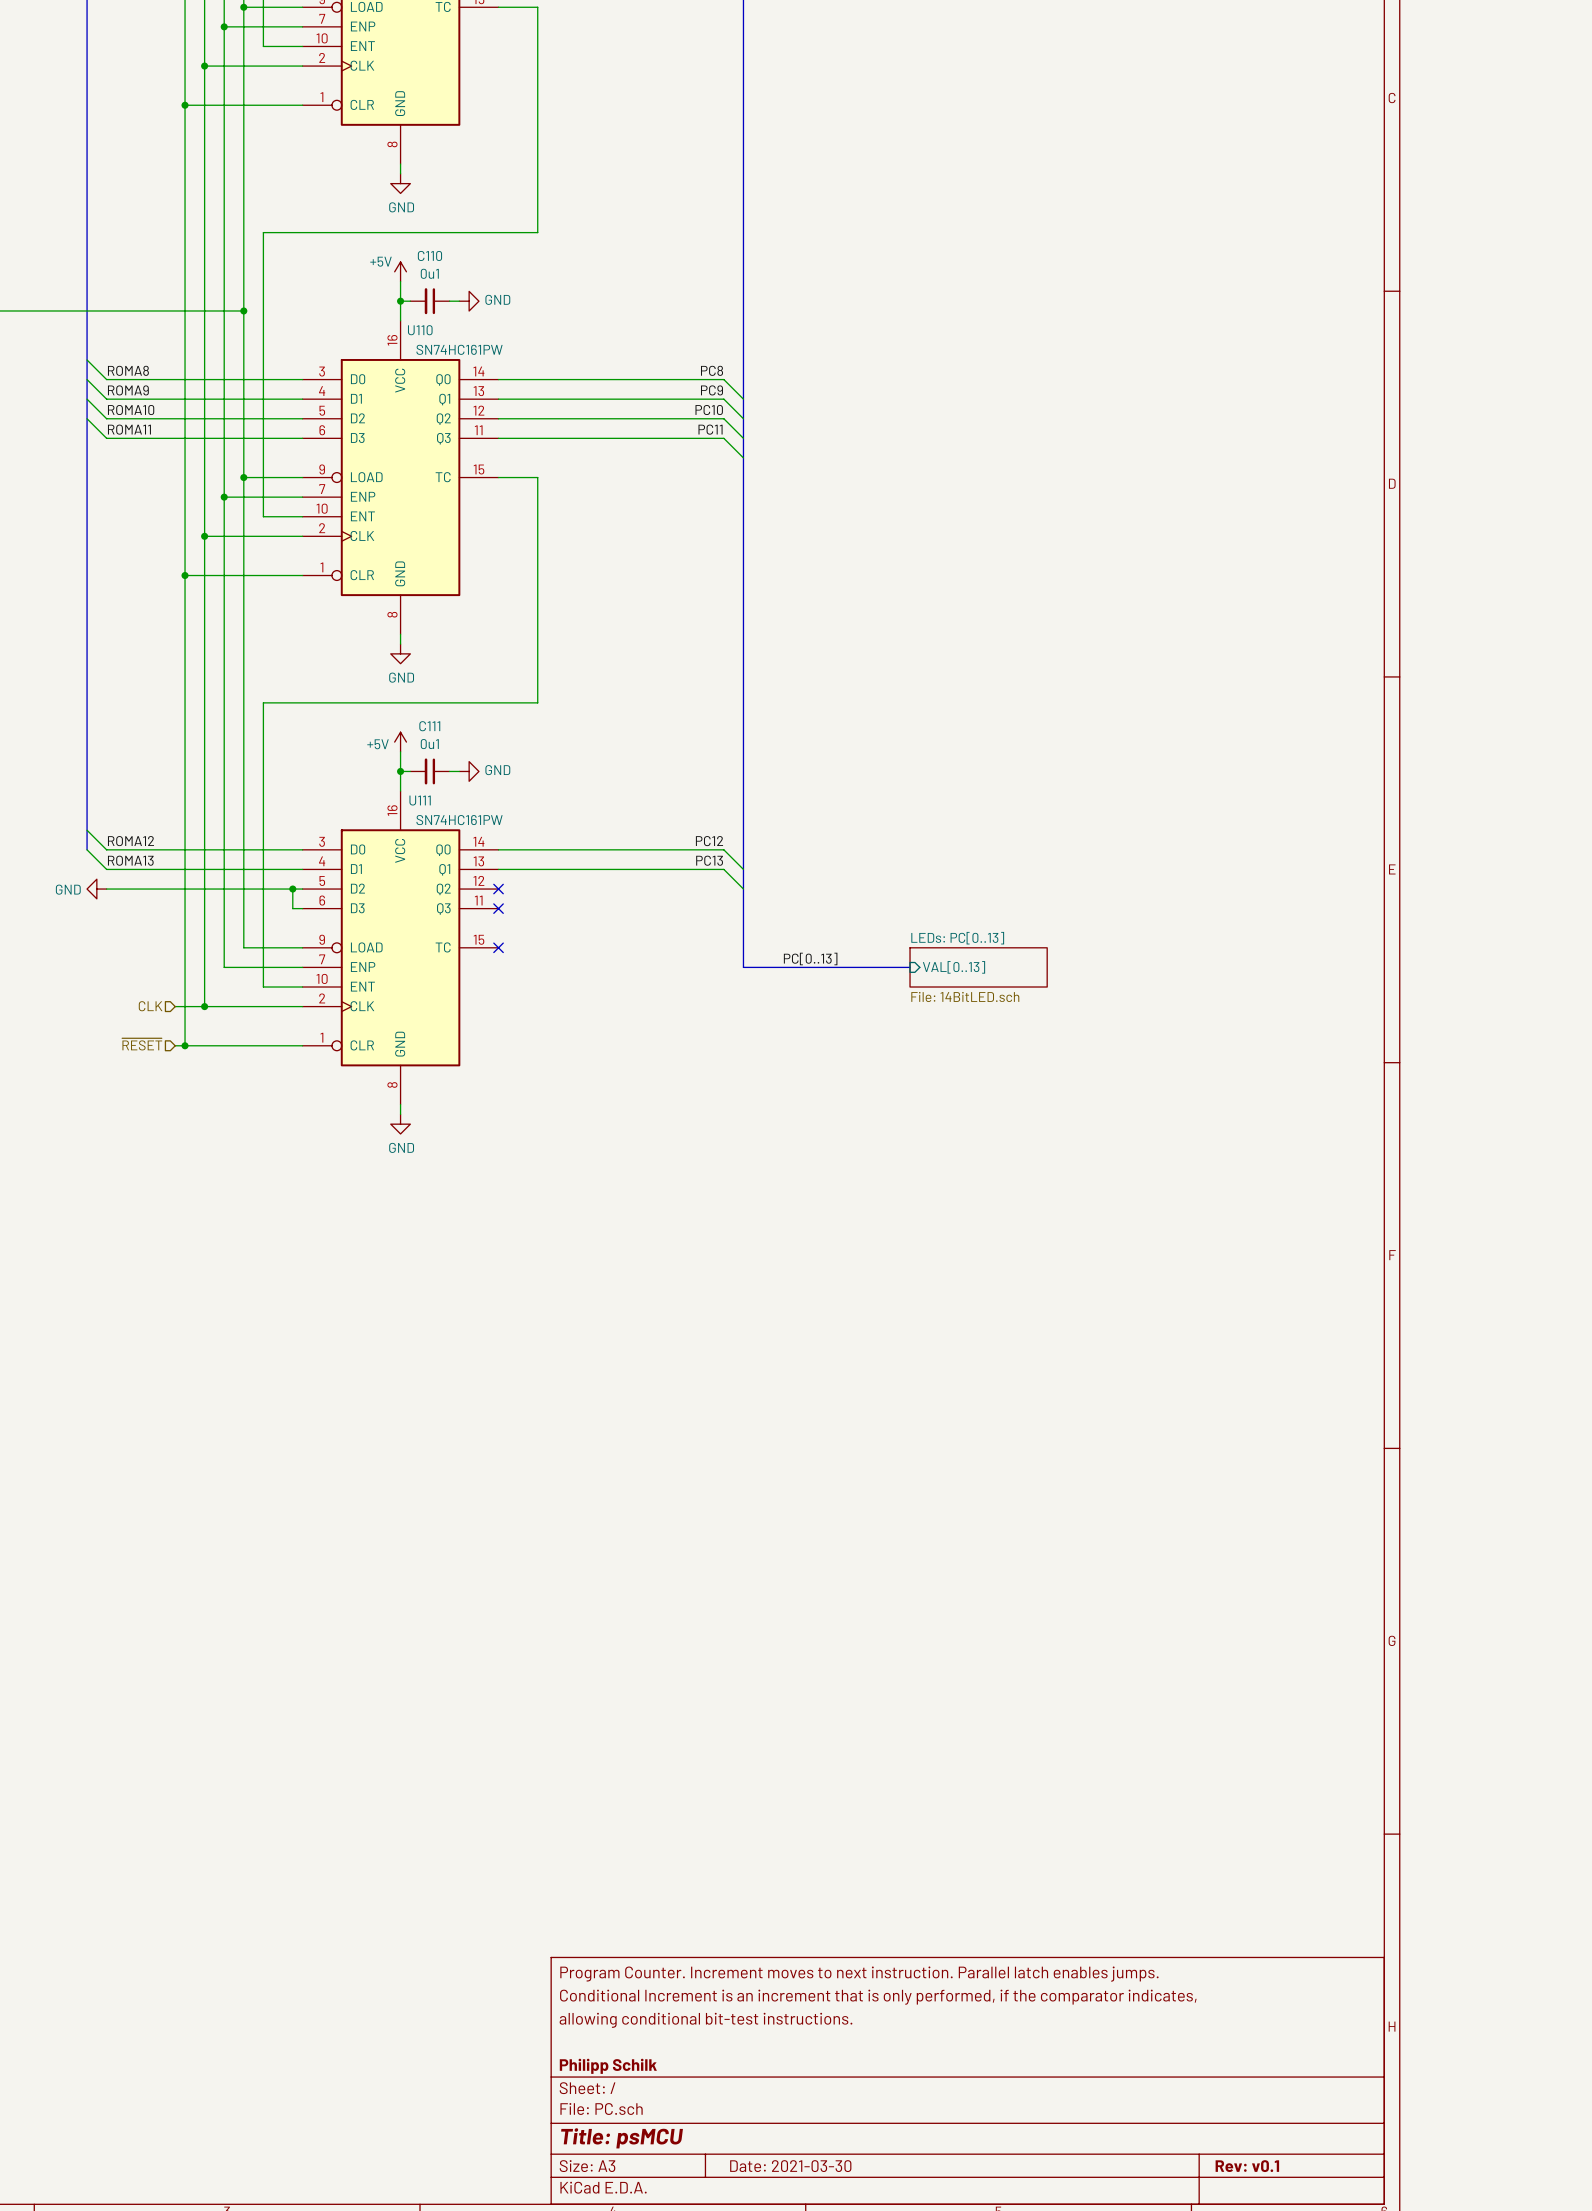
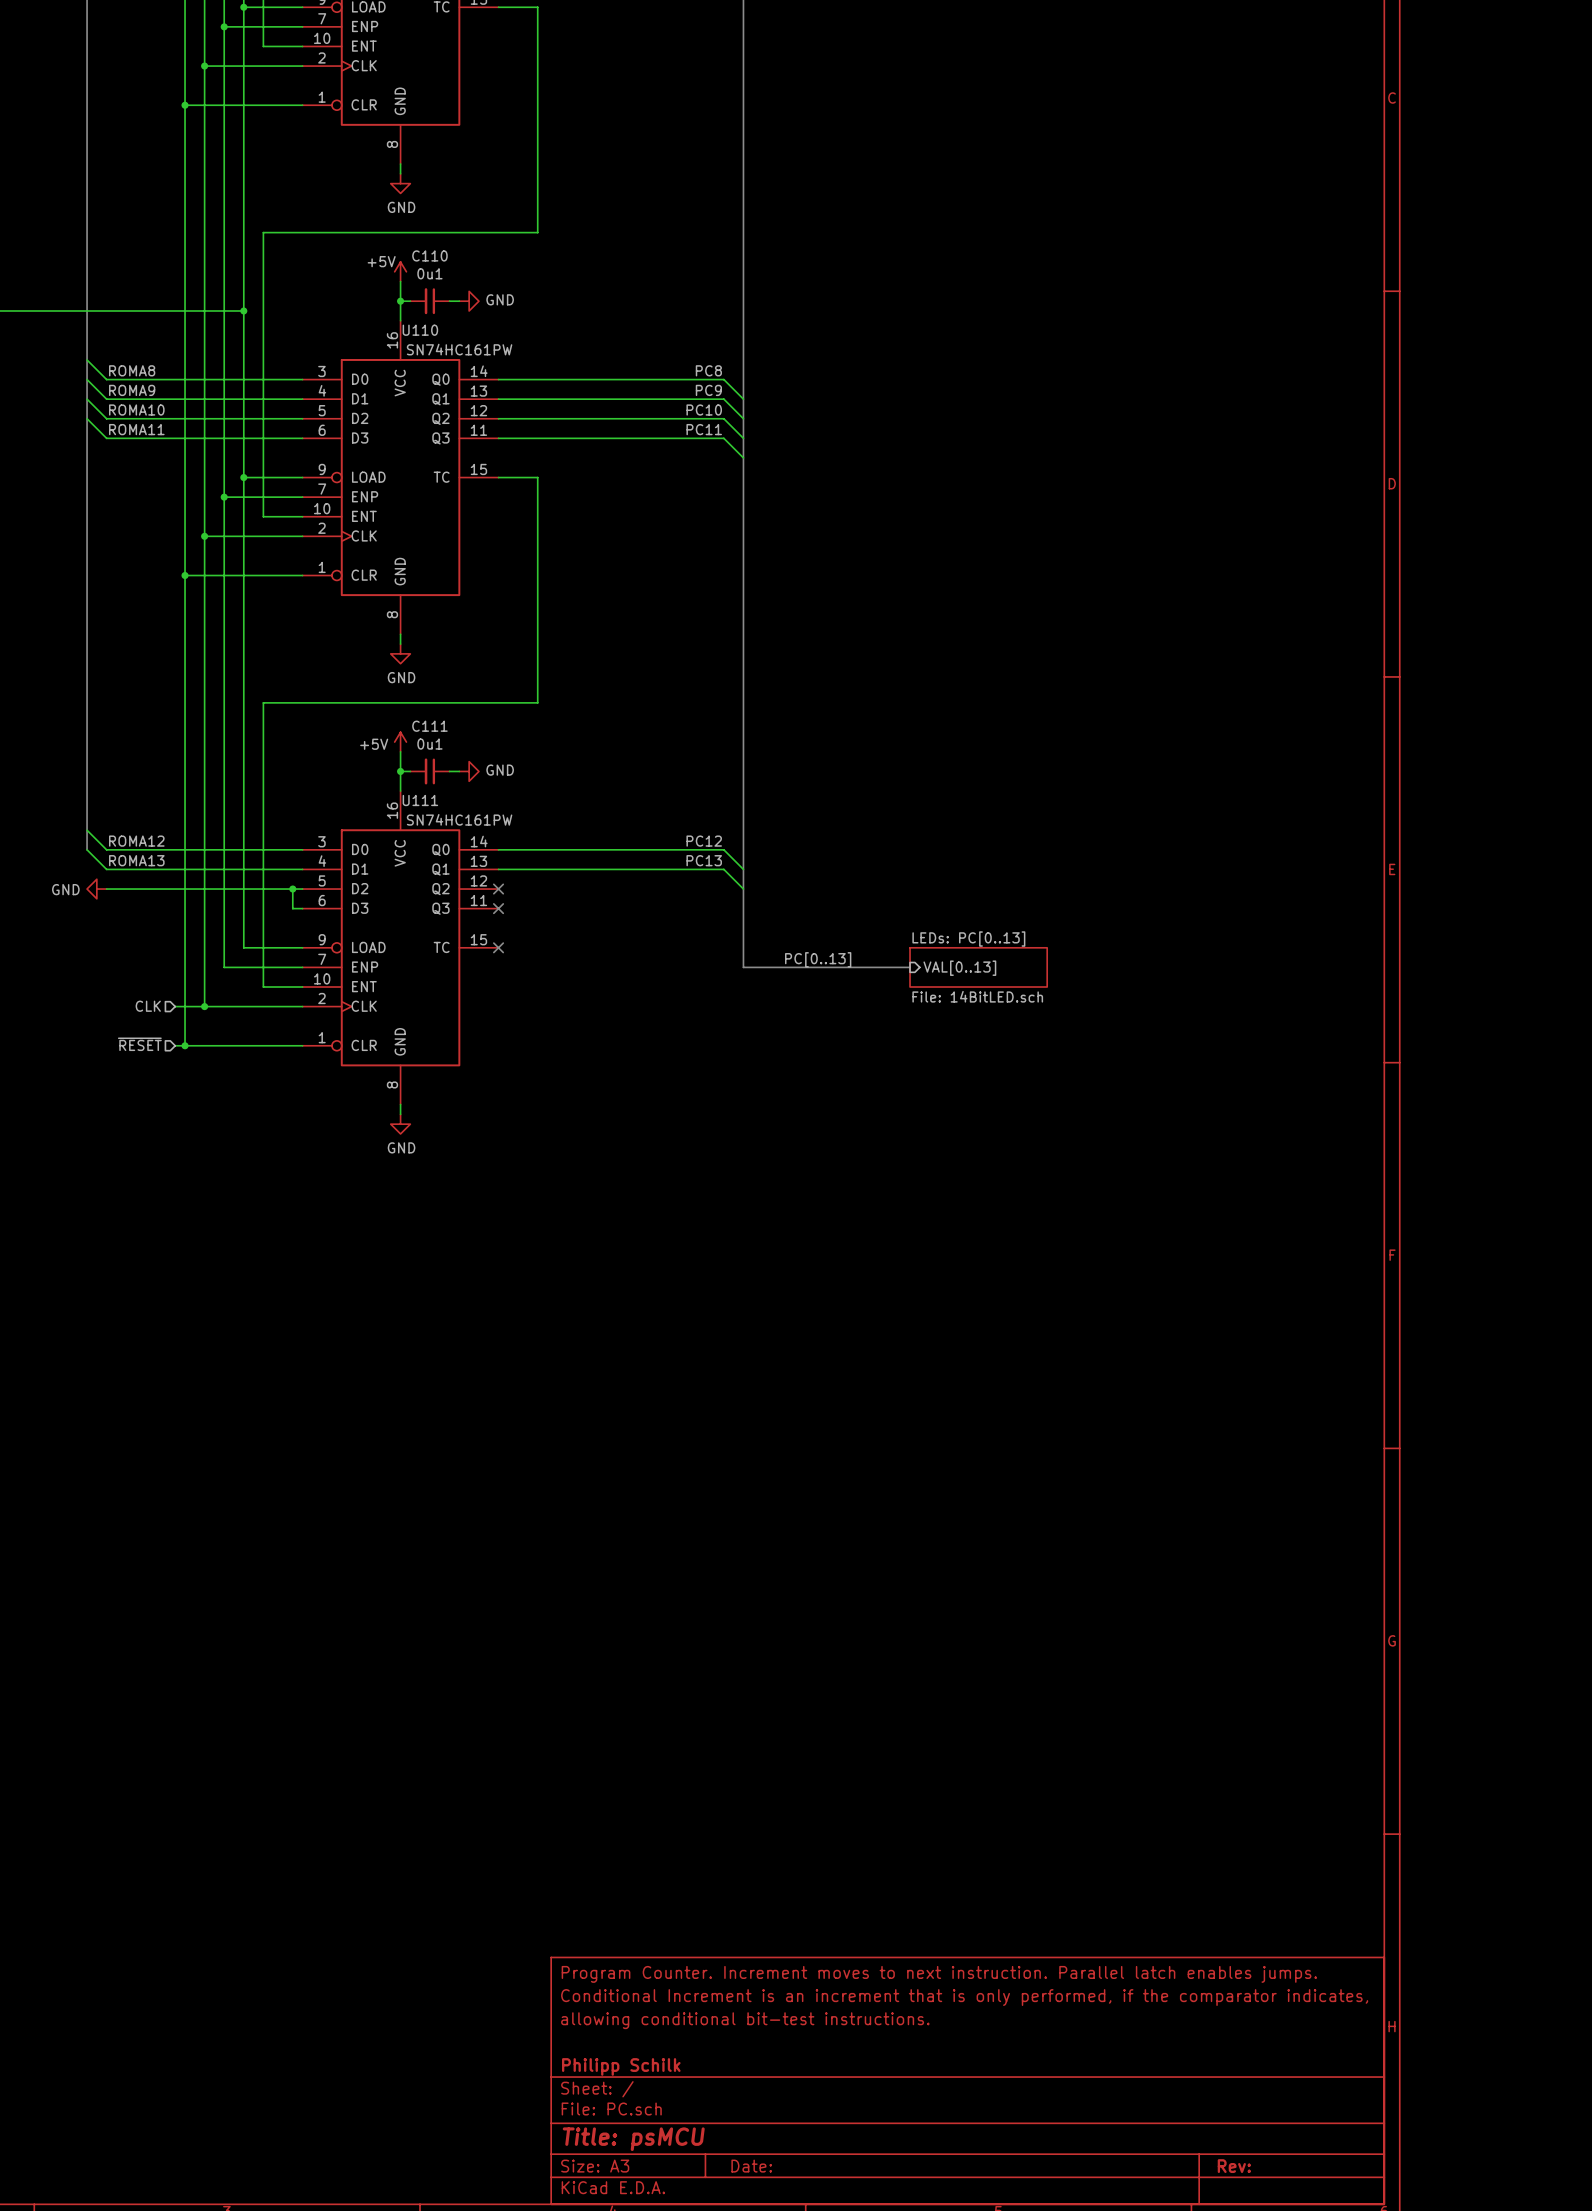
title block: Date: 2021-03-30 (790, 2166) -> Date: (751, 2166)
title block: Rev: v0.1 (1247, 2166) -> Rev: (1234, 2166)

